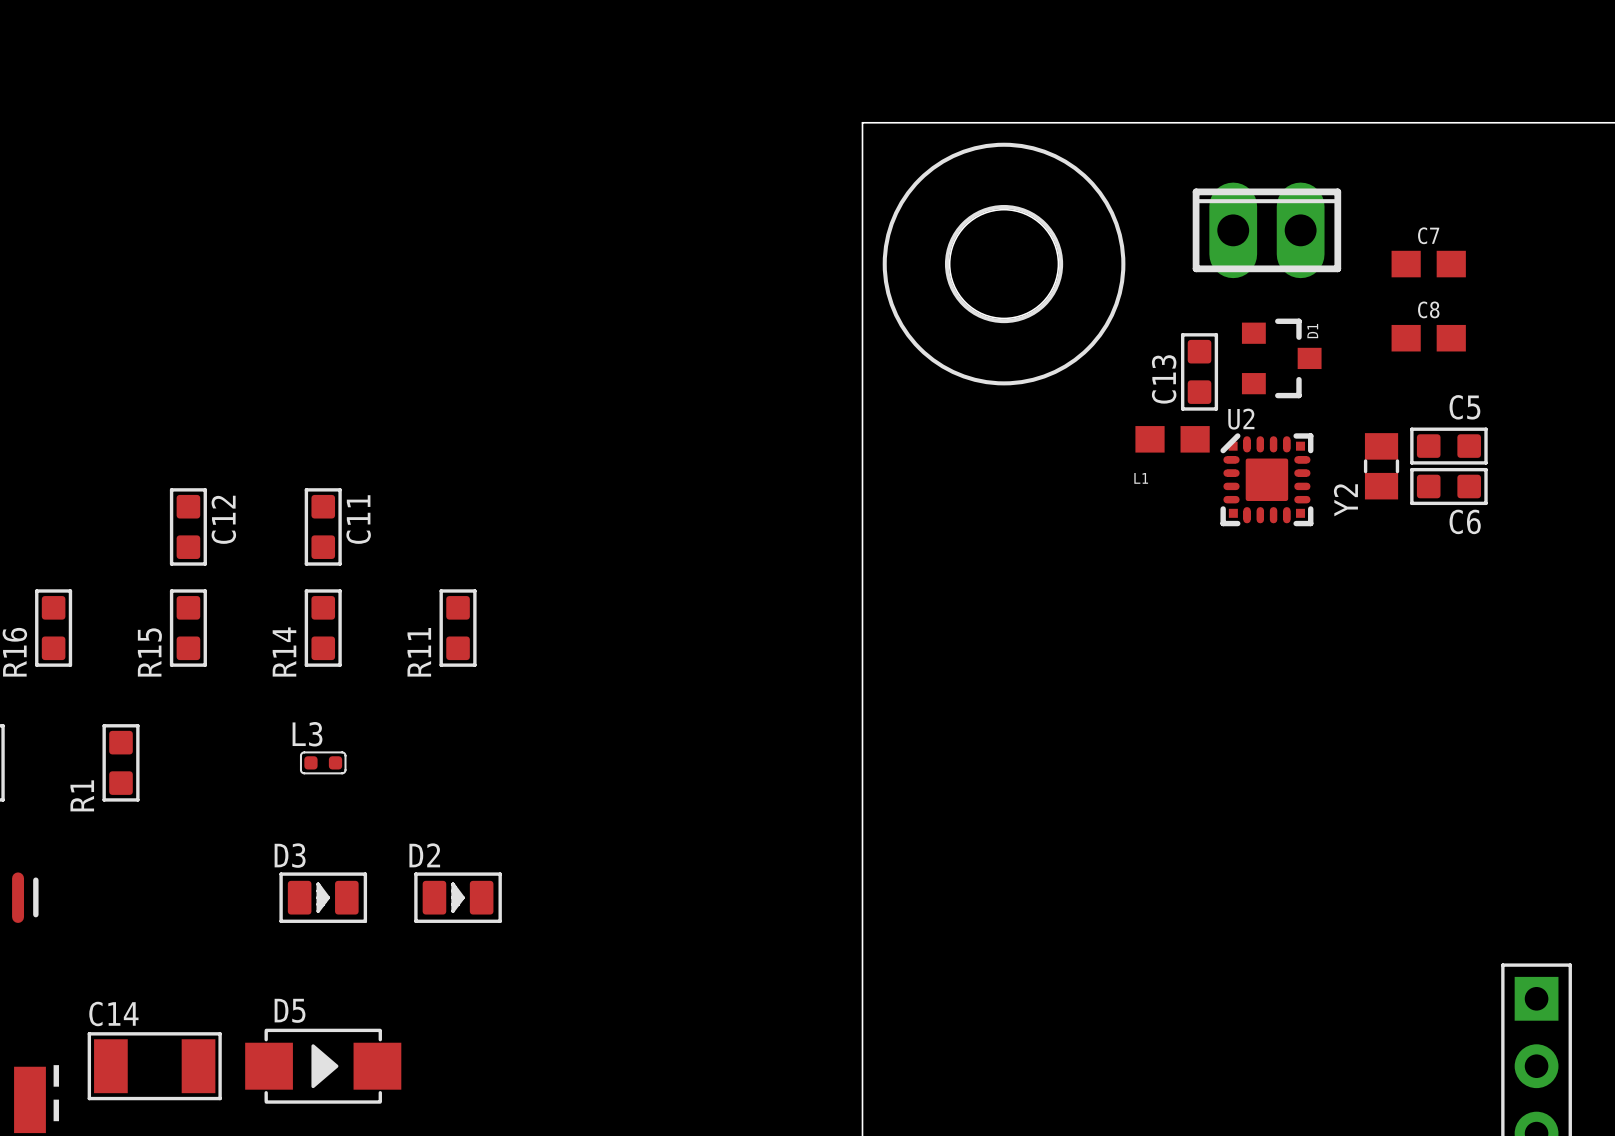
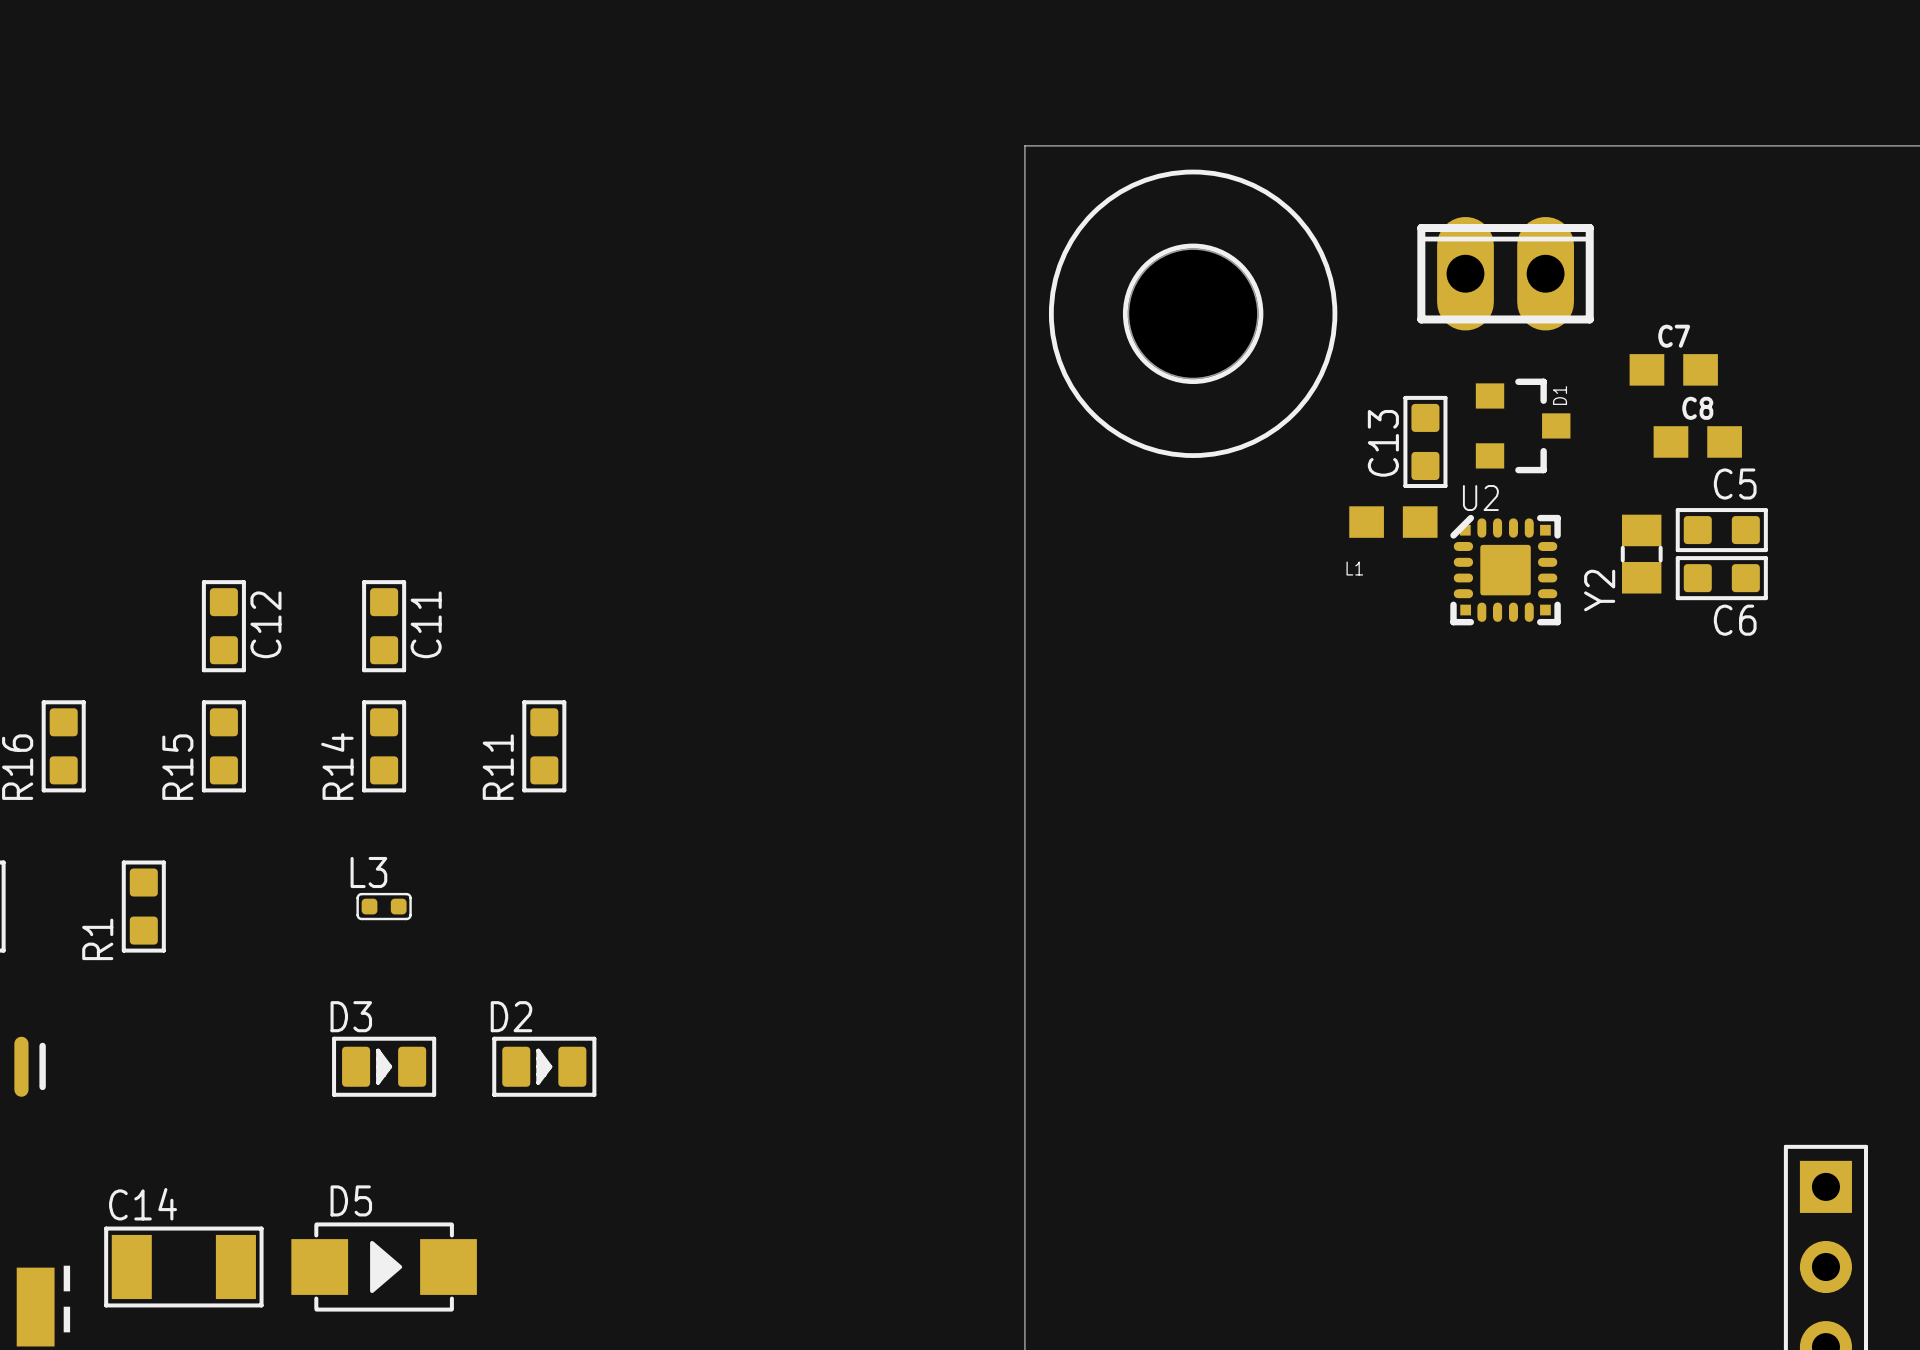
C7 position: (1428, 264) -> (1673, 369)
C8 position: (1428, 338) -> (1697, 441)

